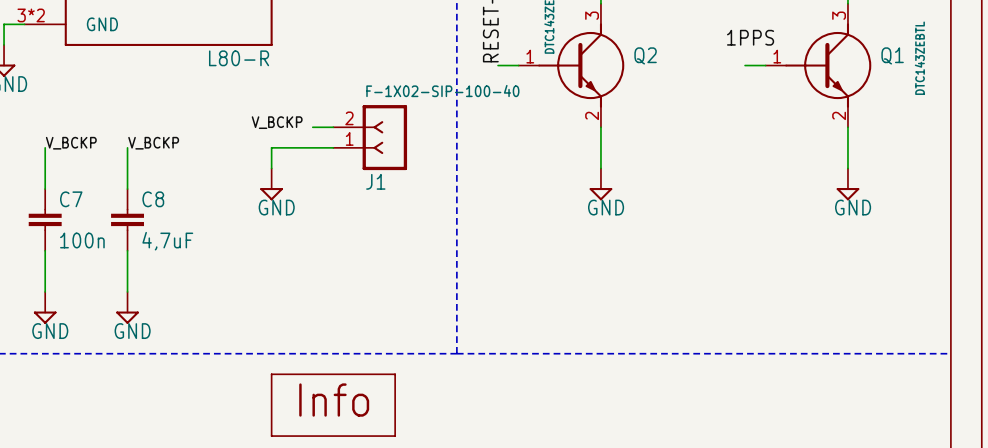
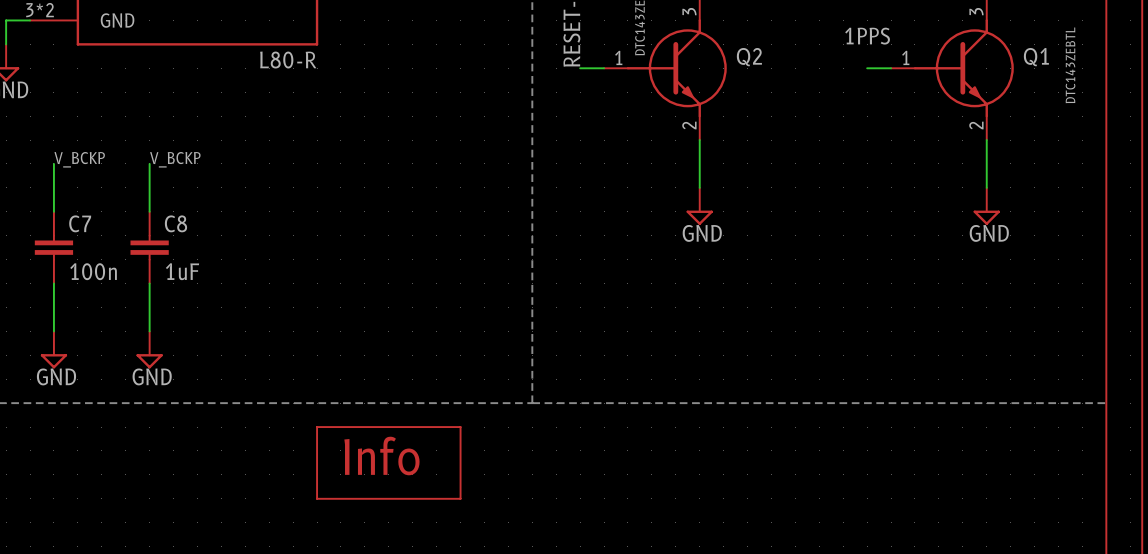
label: V_BCKP (277, 122) -> none
wire: (312, 127) (333, 127) -> none
J1: F-1X02-SIP-100-40 (370, 137) -> none
wire: (333, 147) (271, 147) (271, 168) -> none
power symbol: GND (271, 184) -> none
C8 value: 4,7uF (167, 241) -> 1uF (182, 271)

